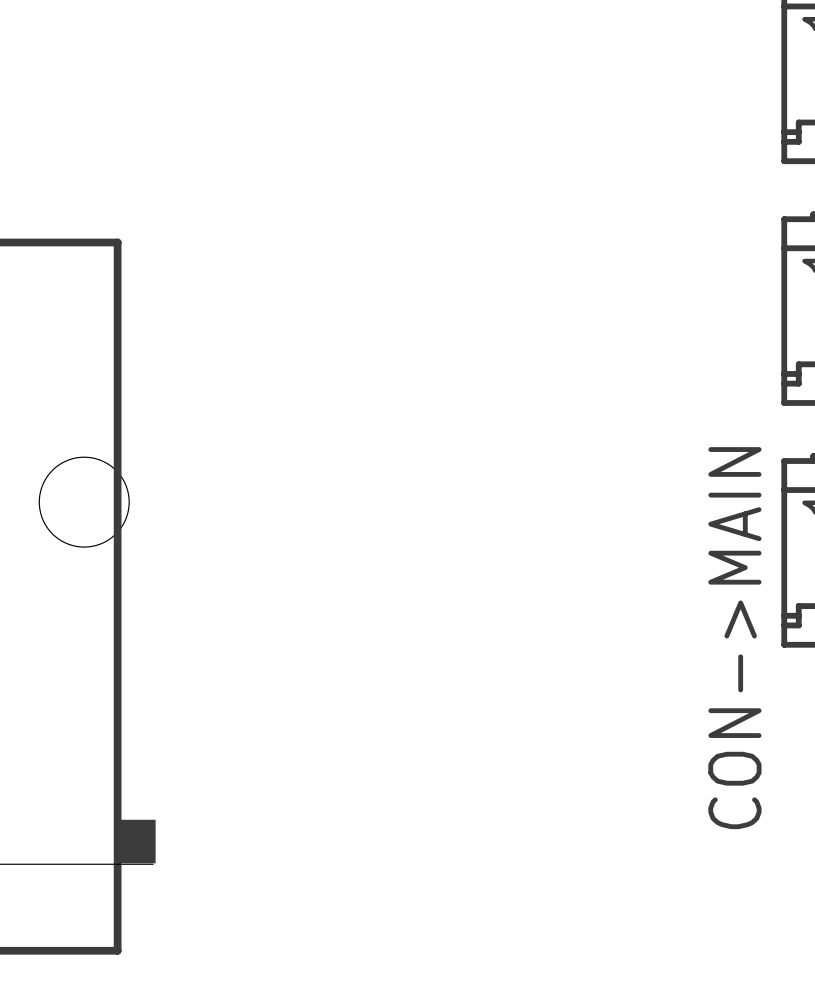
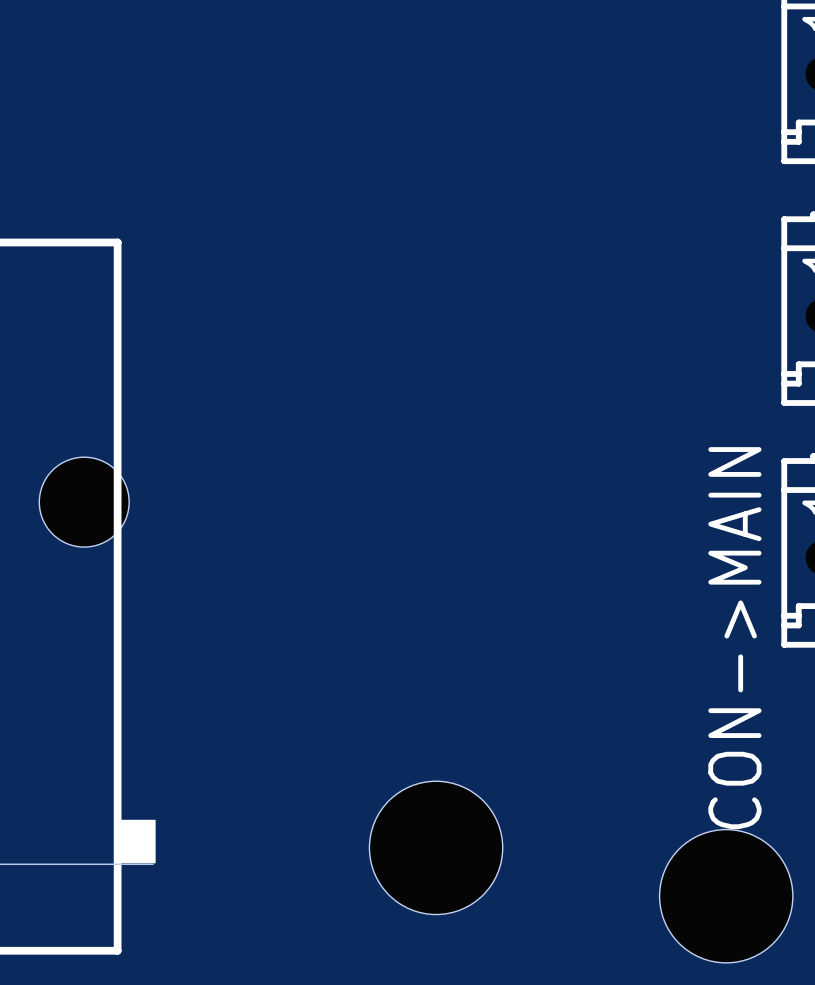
hole: none -> (436, 847)
hole: none -> (726, 896)

